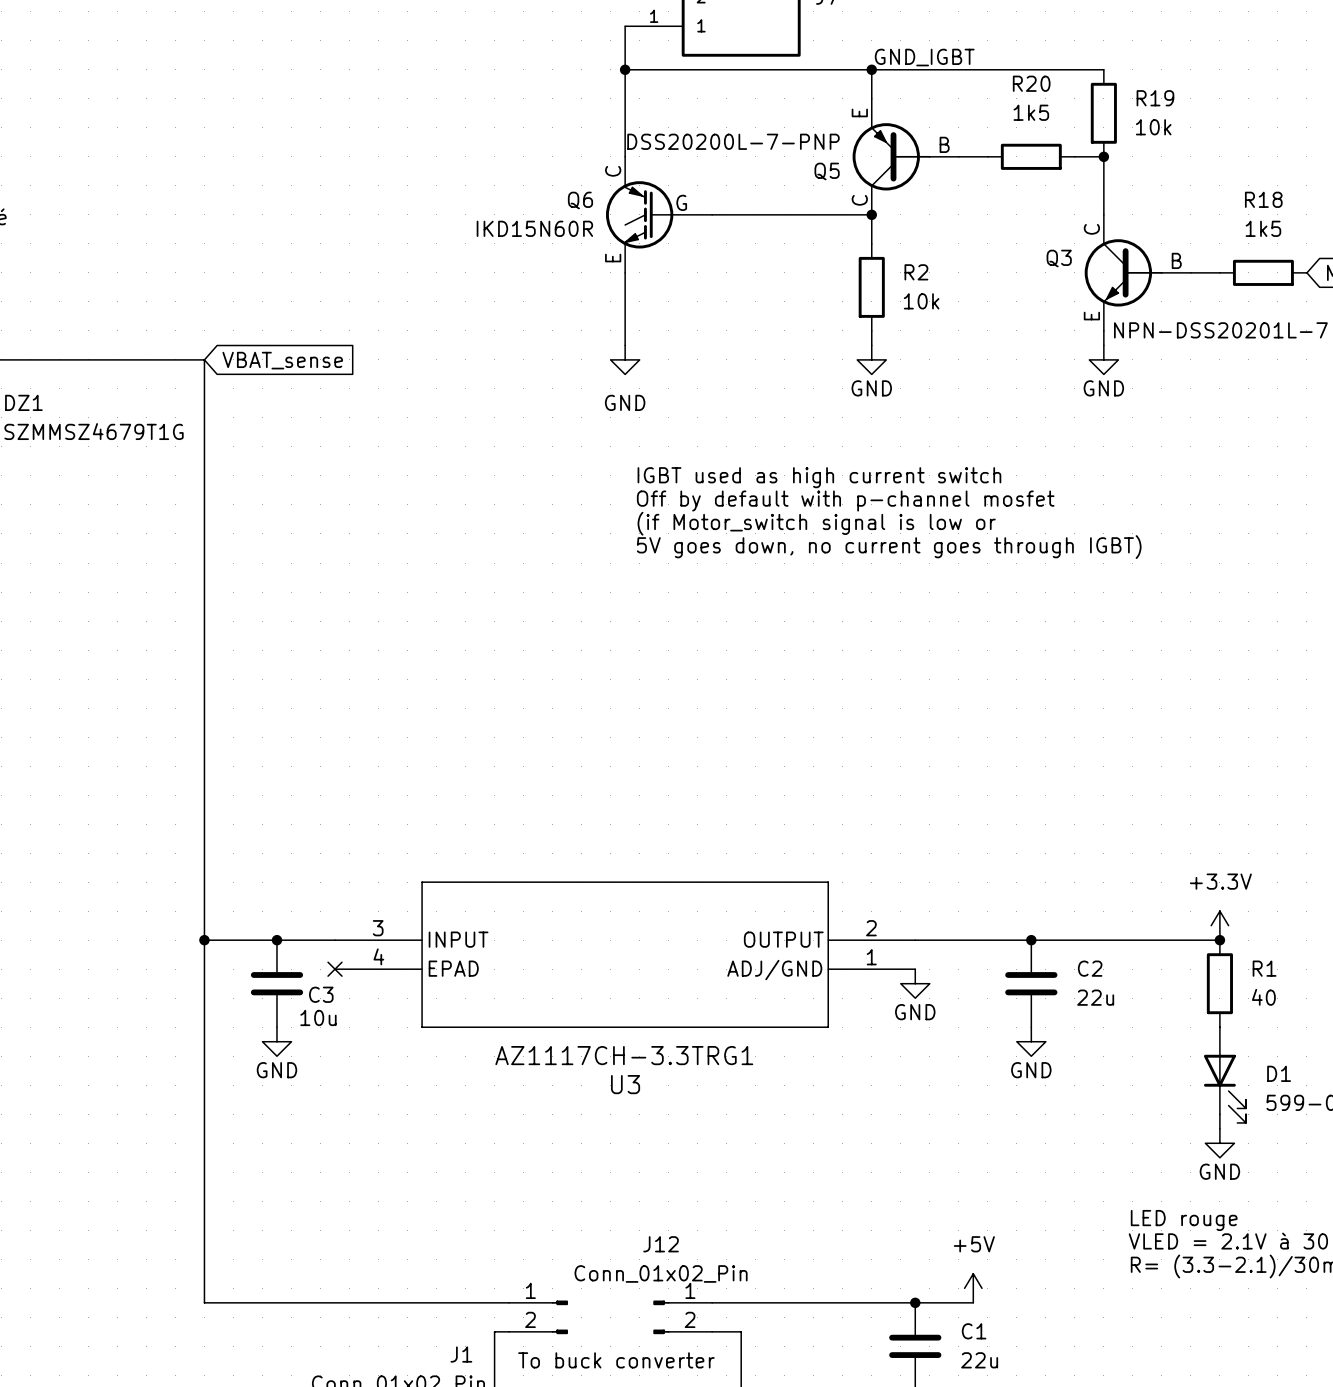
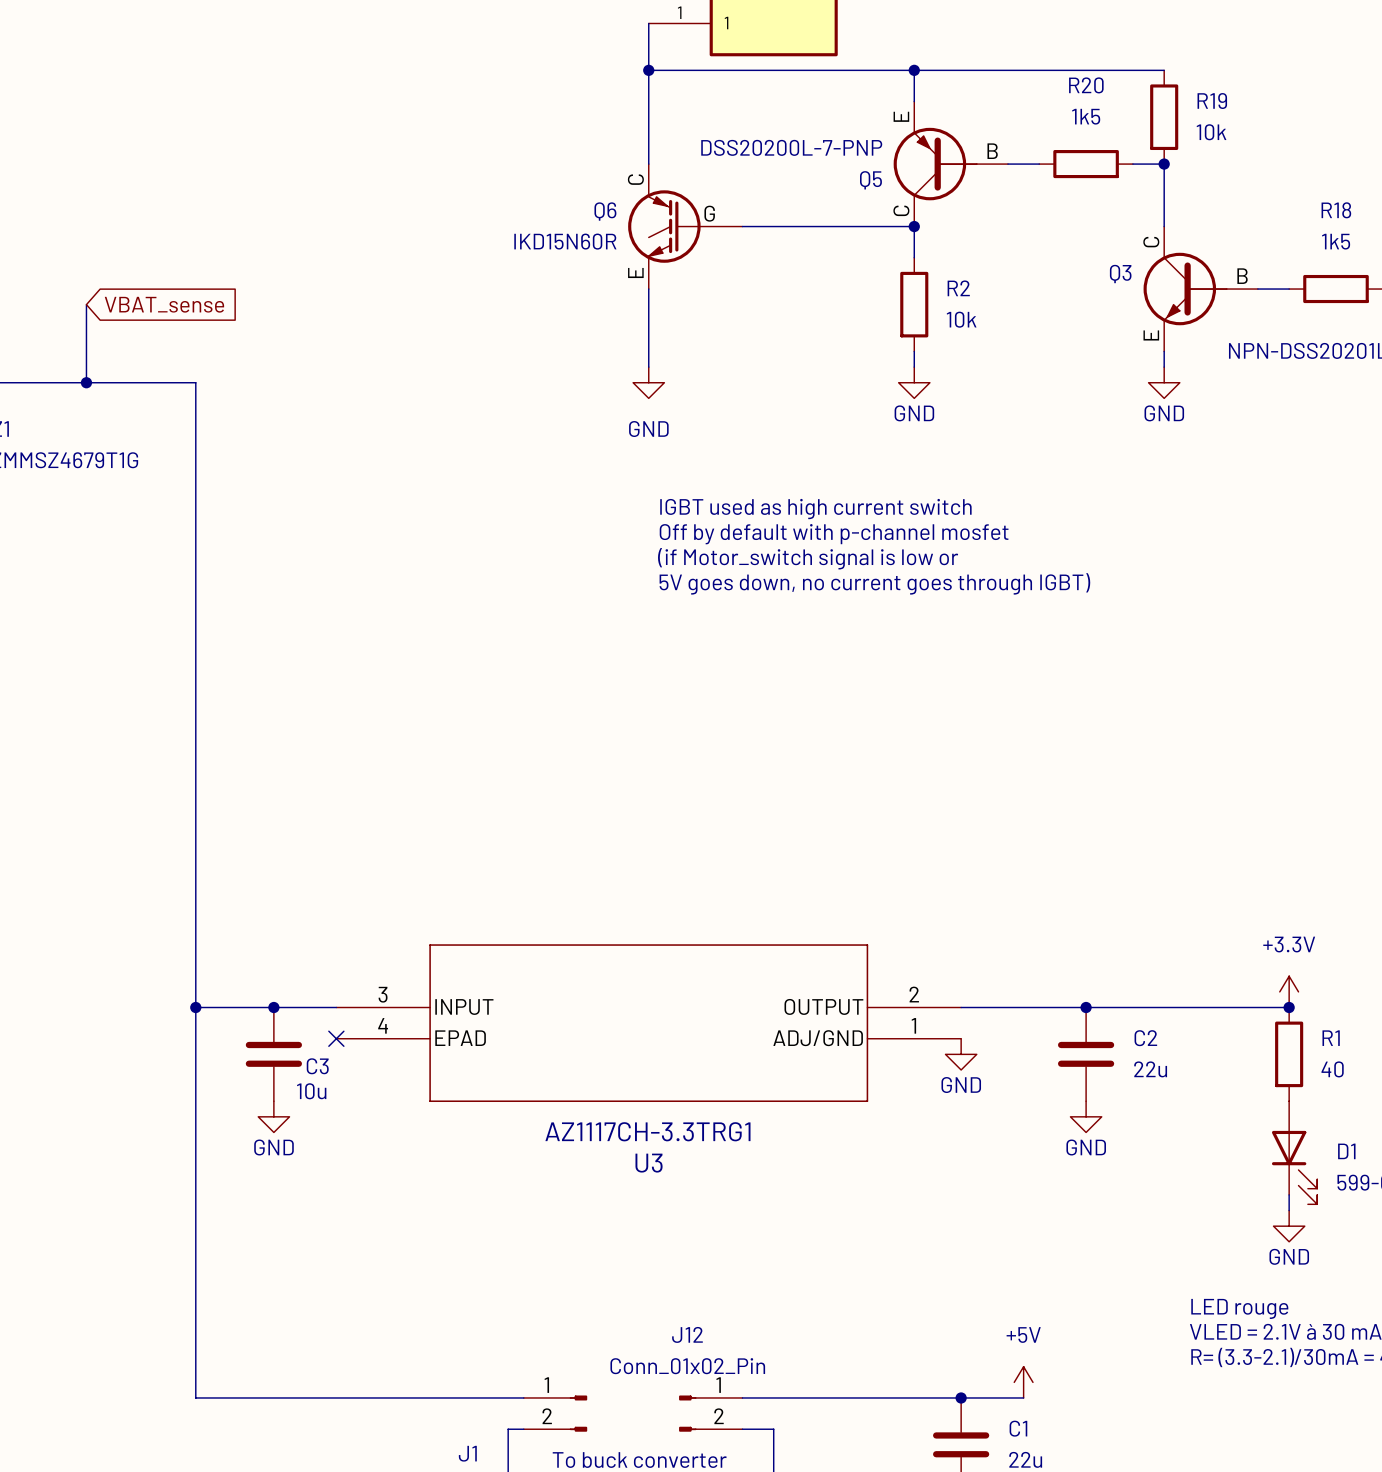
label: GND_IGBT (924, 57) -> none
wire: none -> (86, 304) (86, 382)
junction: none -> (86, 382)
global label position: VBAT_sense (282, 360) -> VBAT_sense (164, 304)

